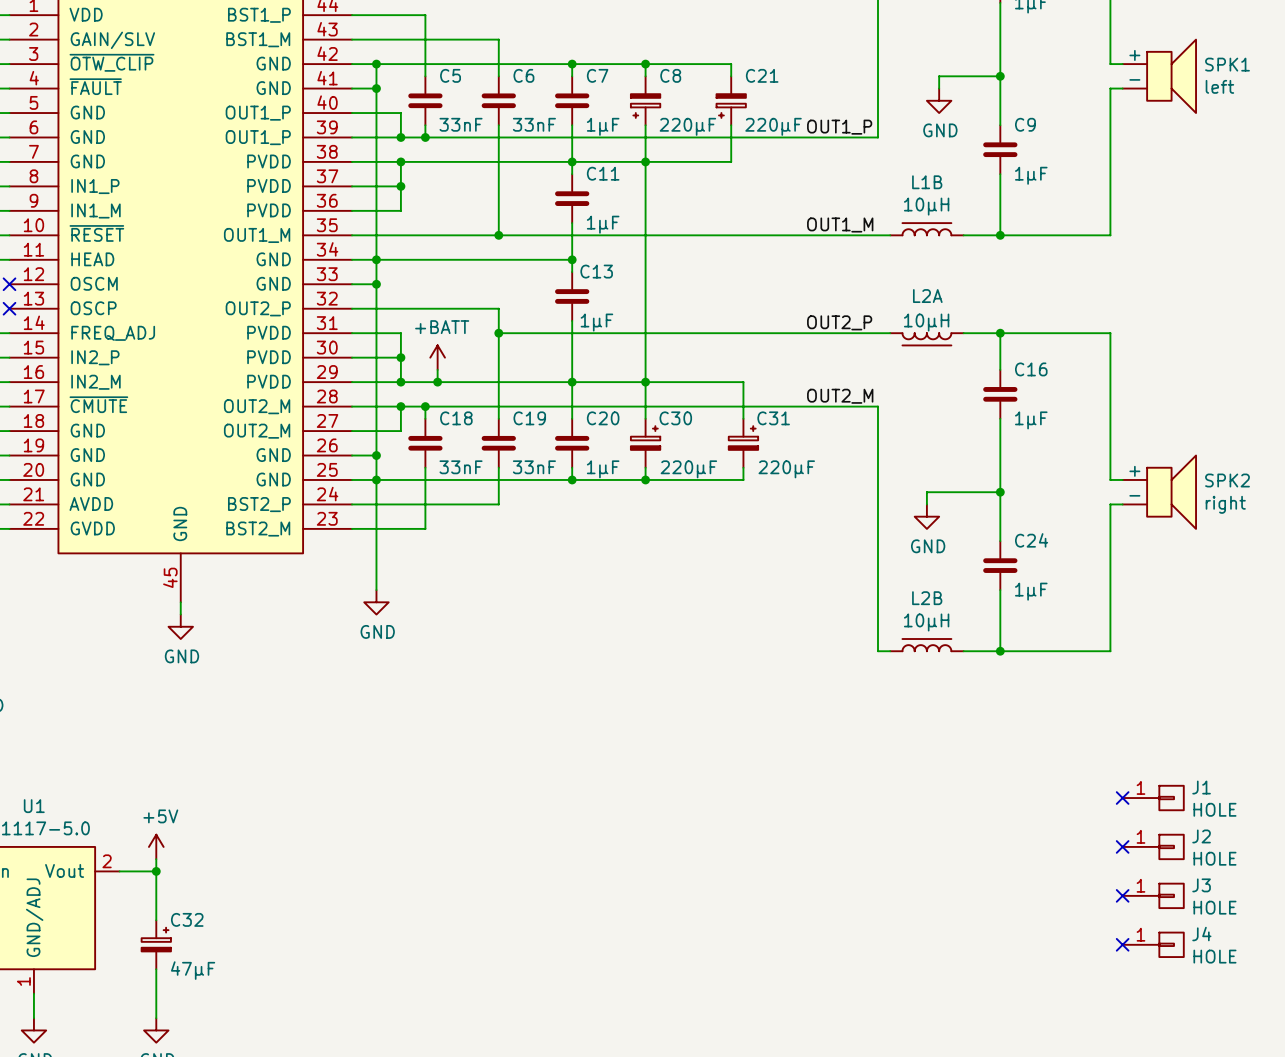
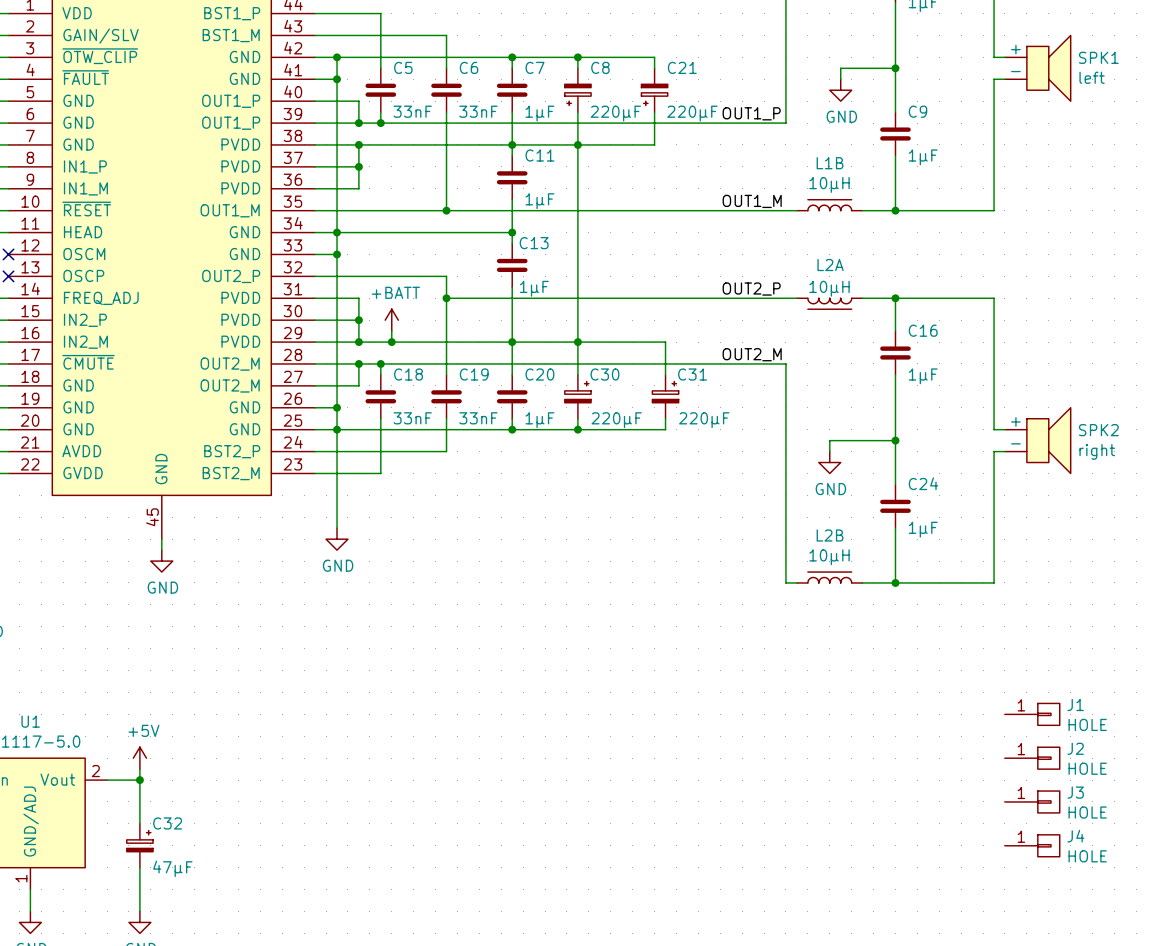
no-connect mark: (1122, 798) -> none
no-connect mark: (1122, 846) -> none
no-connect mark: (1122, 895) -> none
no-connect mark: (1122, 944) -> none

